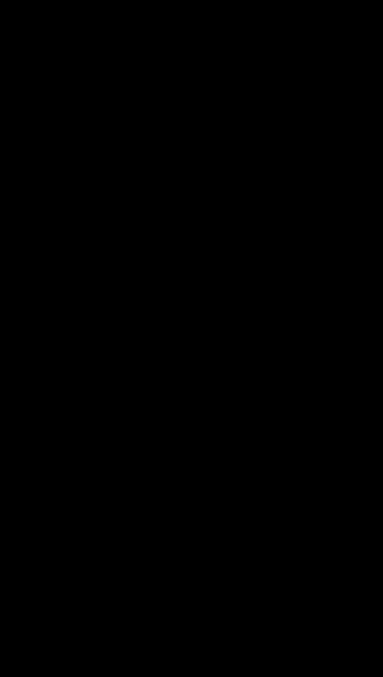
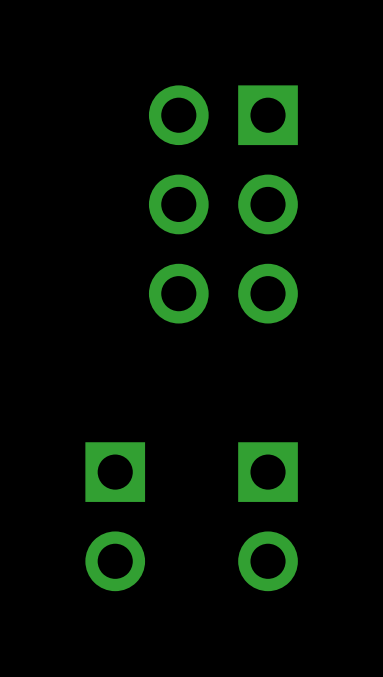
part: none -> (223, 204)
part: none -> (115, 516)
part: none -> (268, 516)

